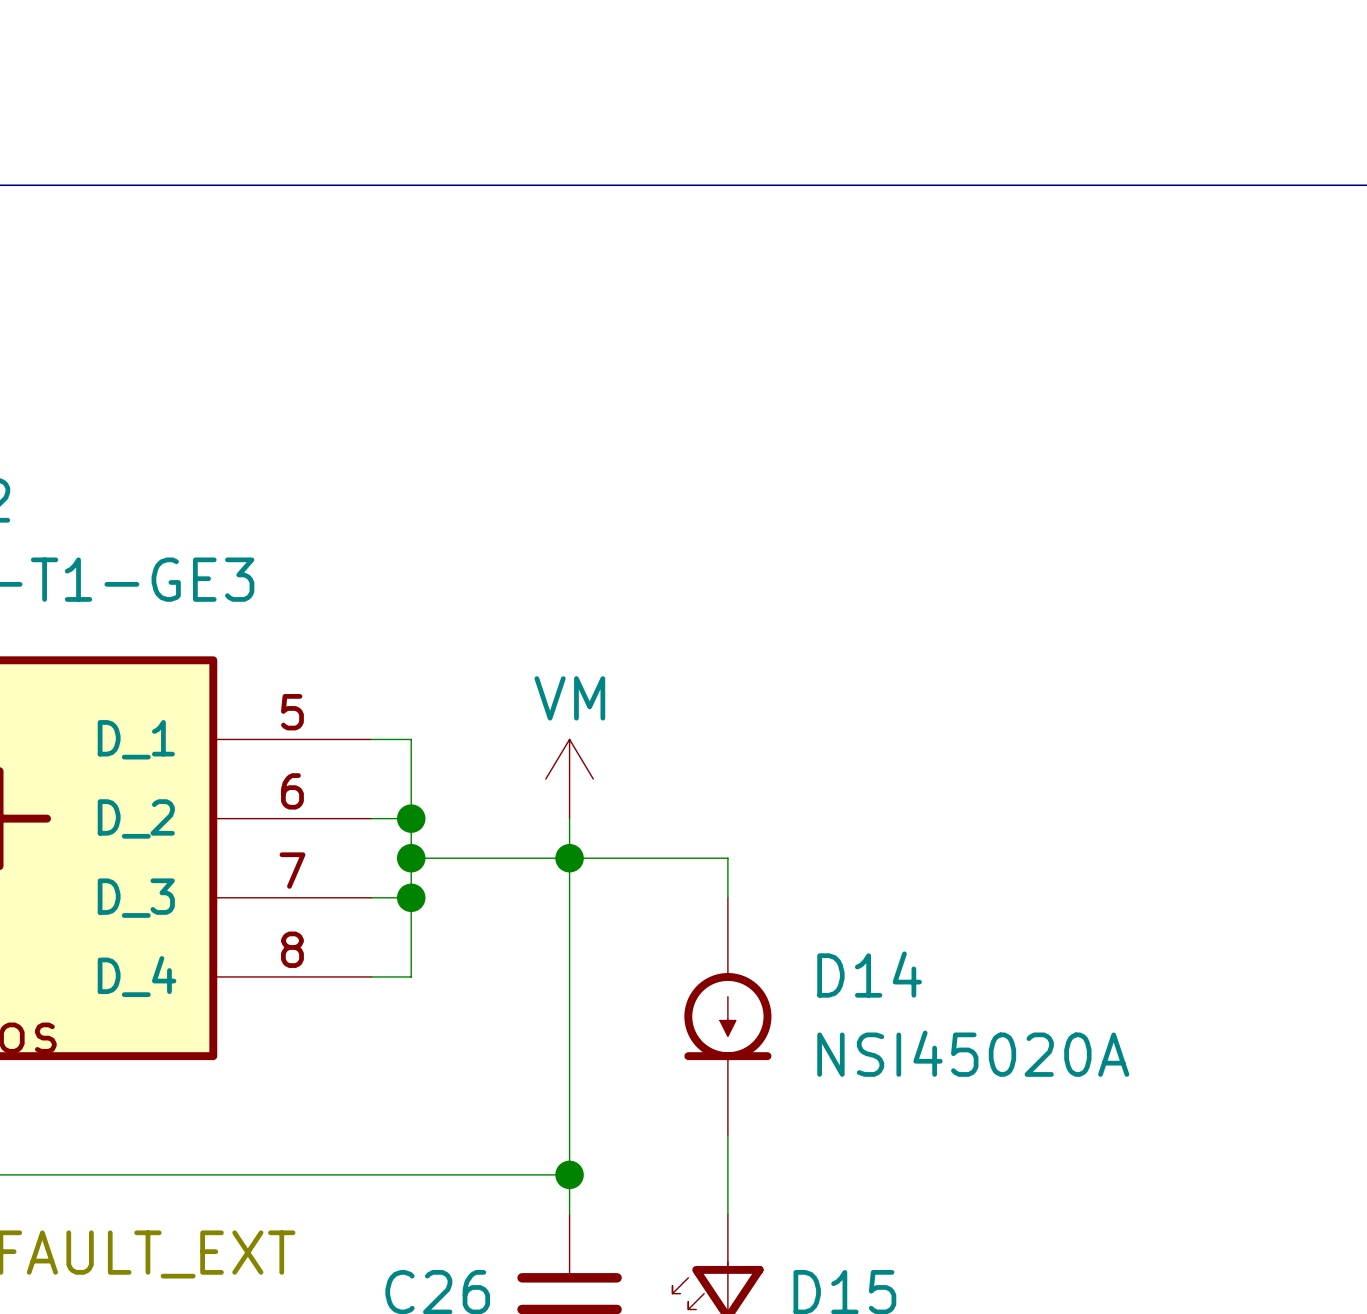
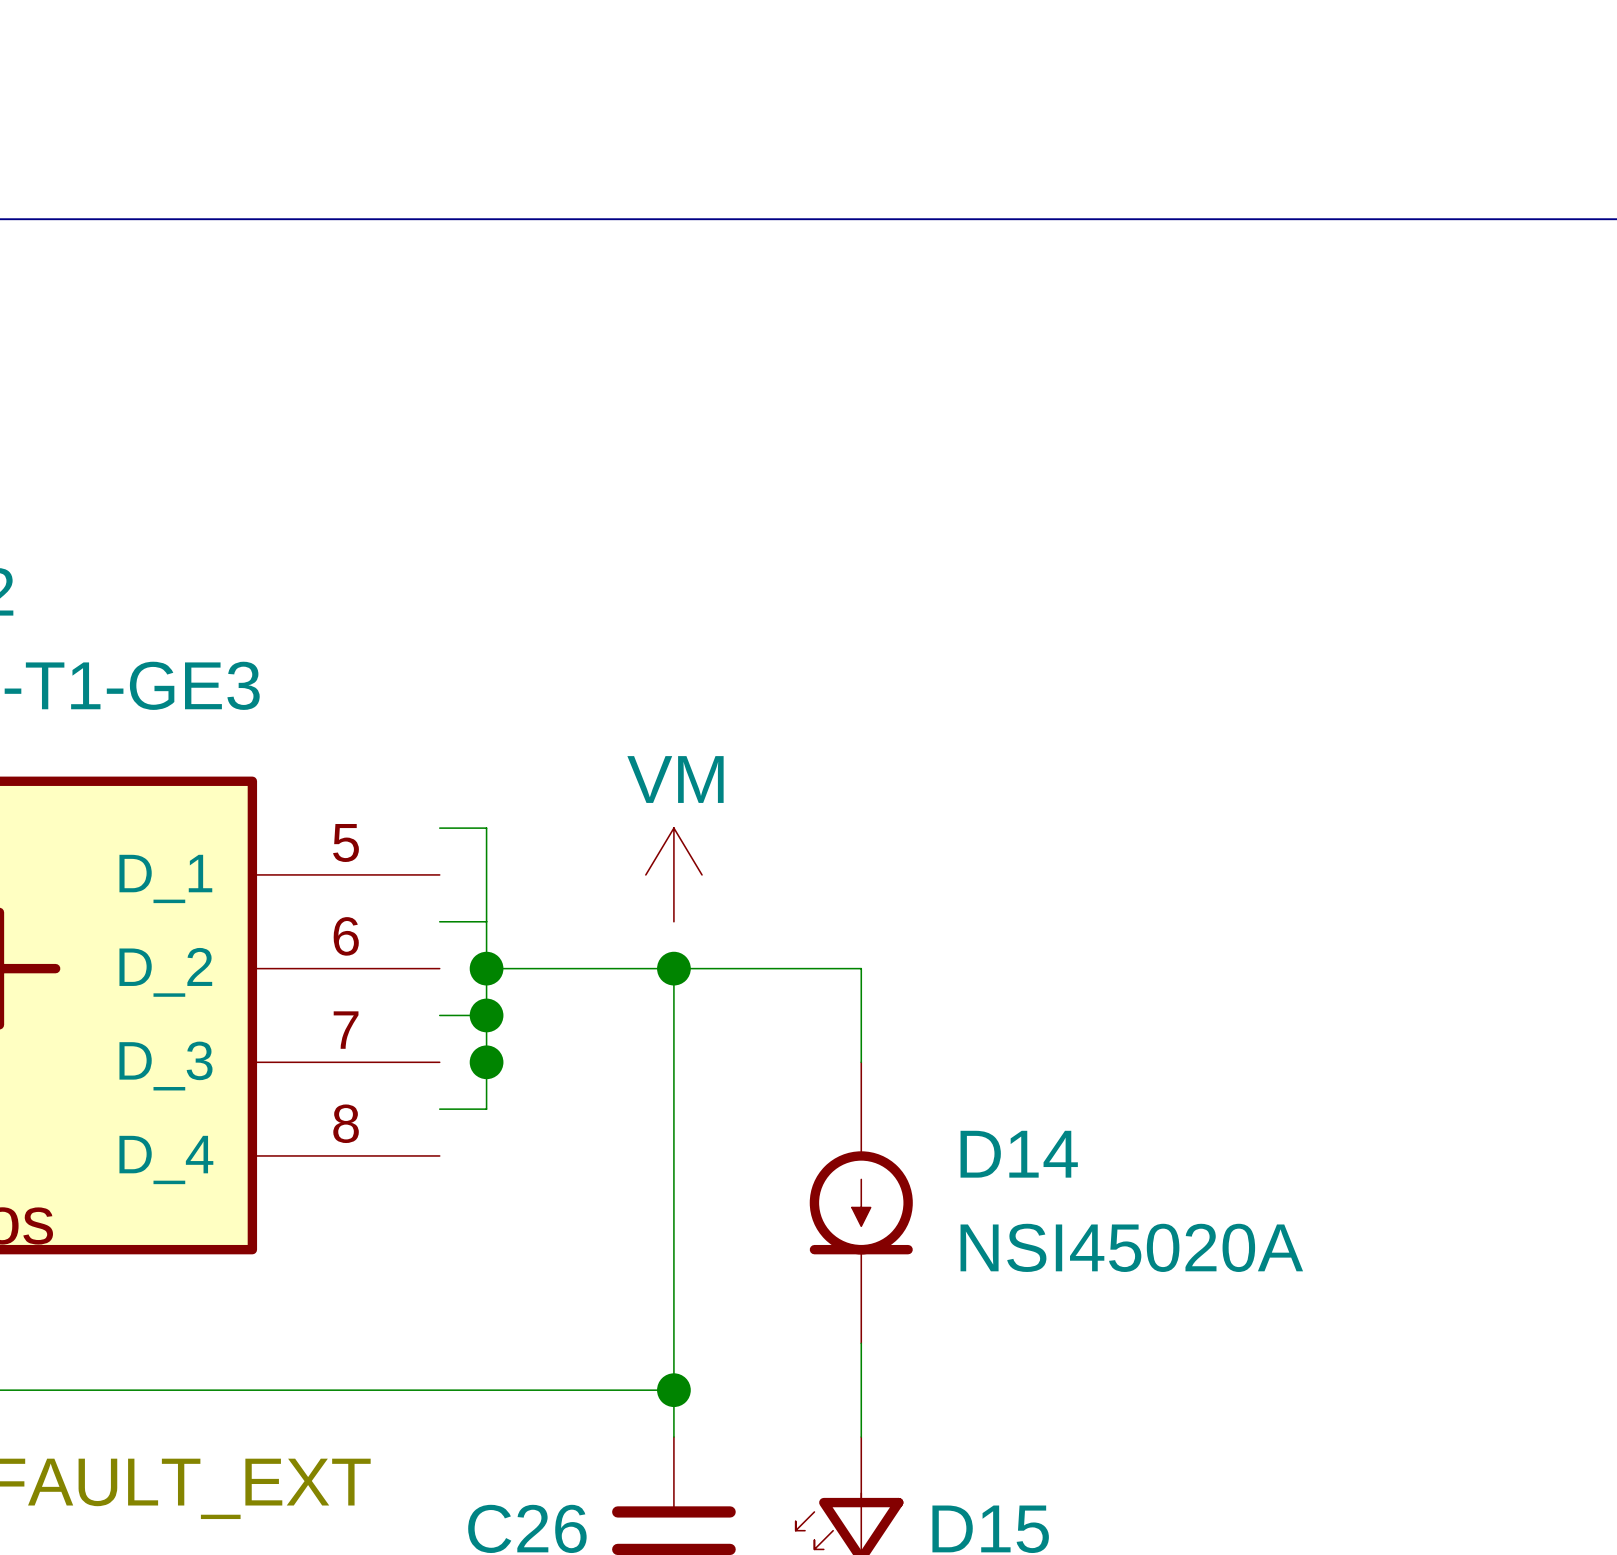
wire: (371, 739) (411, 739) -> (439, 828) (486, 828) (486, 874)
power symbol position: VM (569, 779) -> VM (673, 874)
wire: (371, 818) (411, 818) -> (439, 921) (486, 921)
wire: (411, 858) (727, 858) -> (486, 968) (861, 968) (861, 1015)
junction position: (569, 858) -> (673, 968)
wire: (371, 897) (411, 897) -> (439, 1015) (486, 1015)
wire: (411, 937) (411, 976) (371, 976) -> (486, 1109) (439, 1109)

